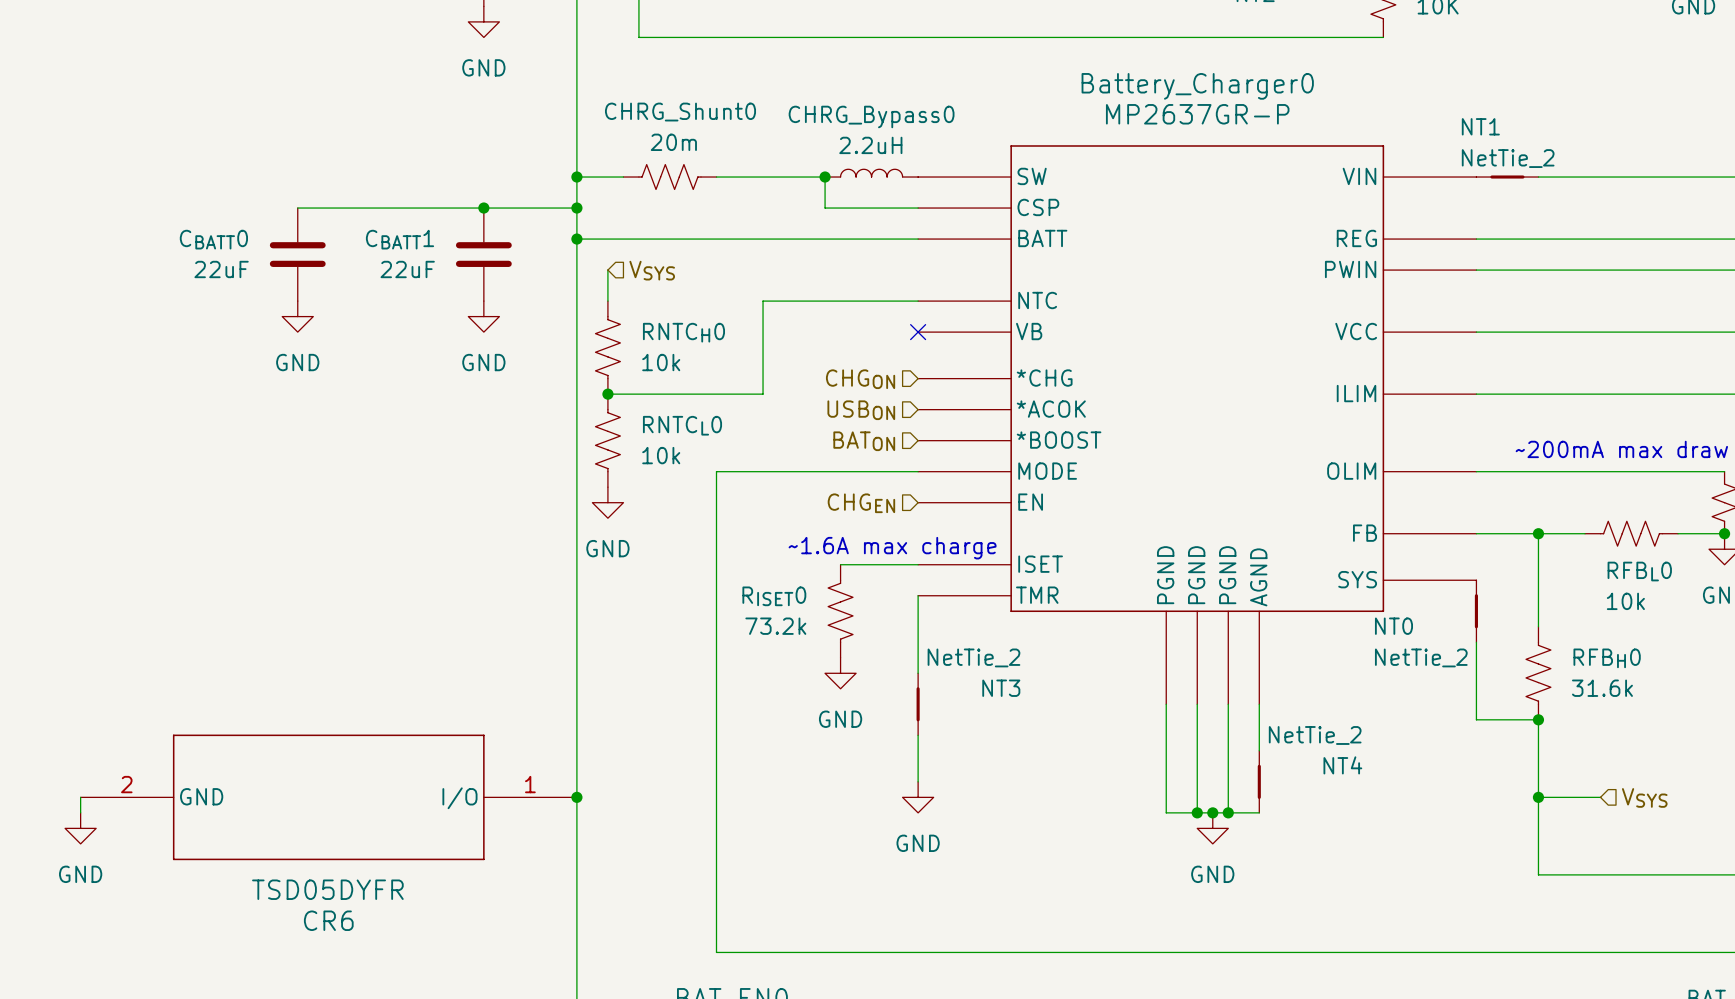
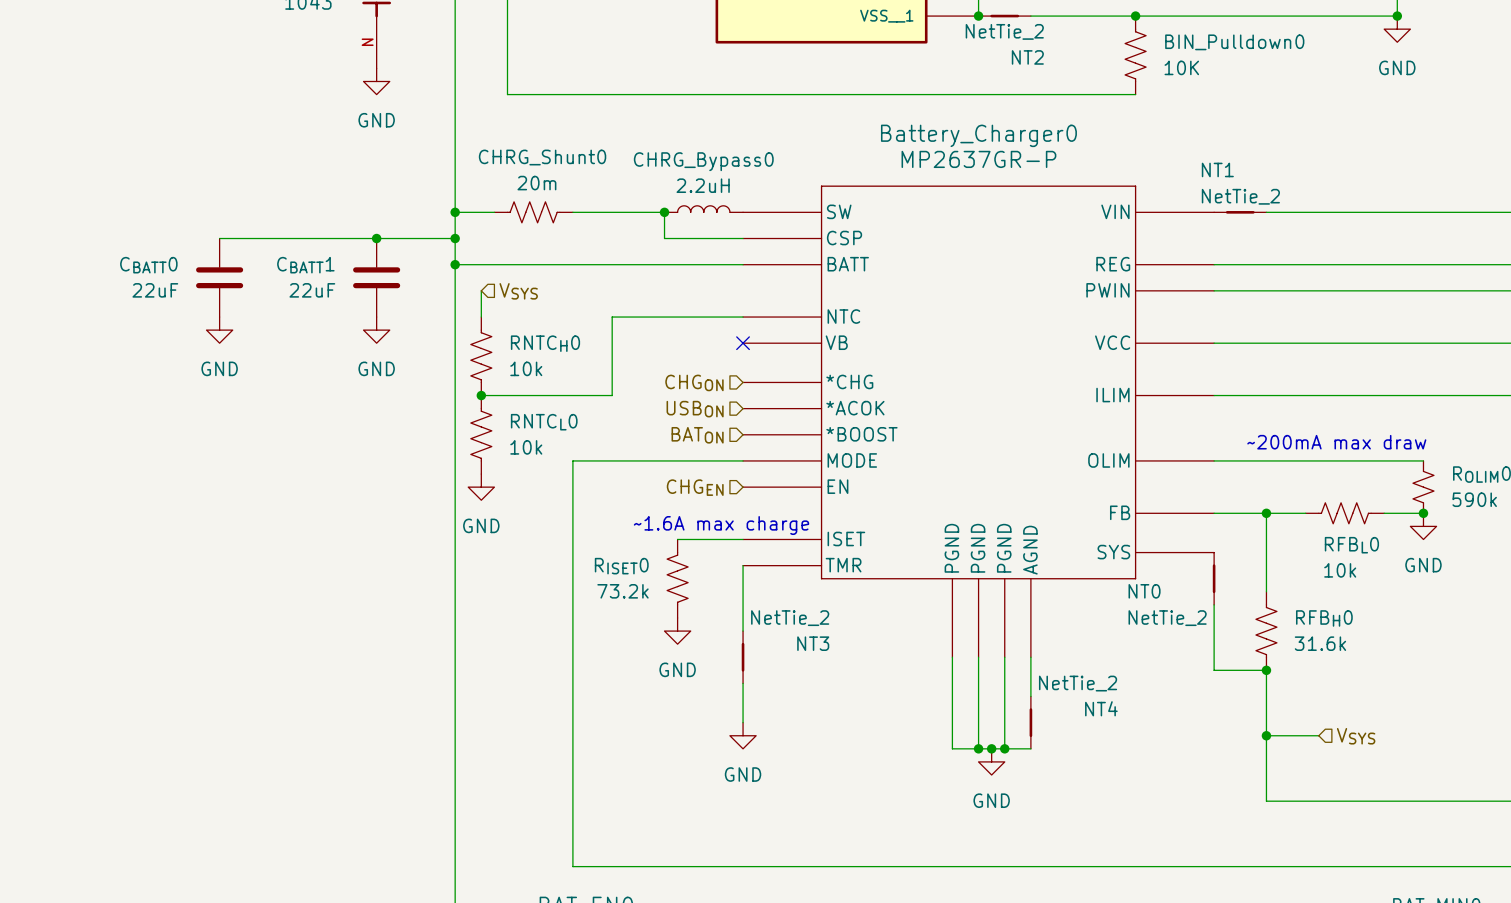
wire: (80, 797) (80, 812) -> none
CR6: TSD05DYFR (328, 797) -> none
junction: (576, 797) -> none
power symbol: GND (80, 828) -> none

